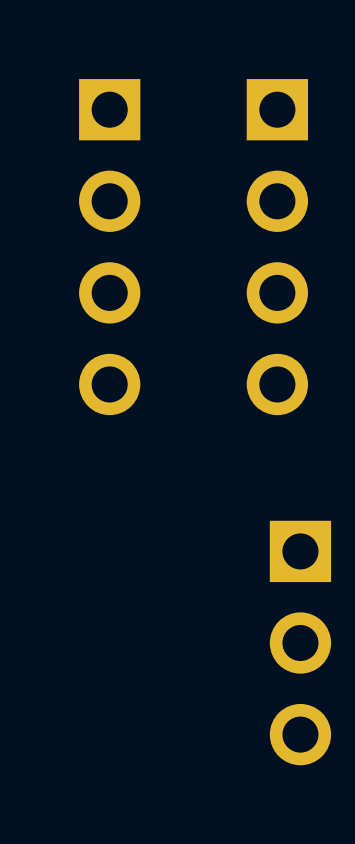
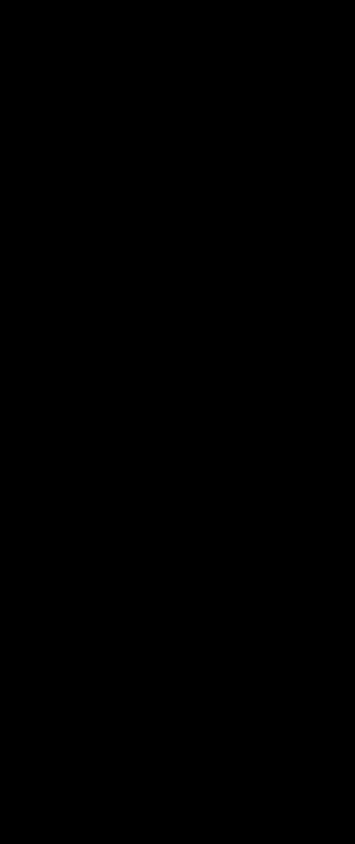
part: (109, 247) -> none
part: (277, 247) -> none
part: (300, 643) -> none

